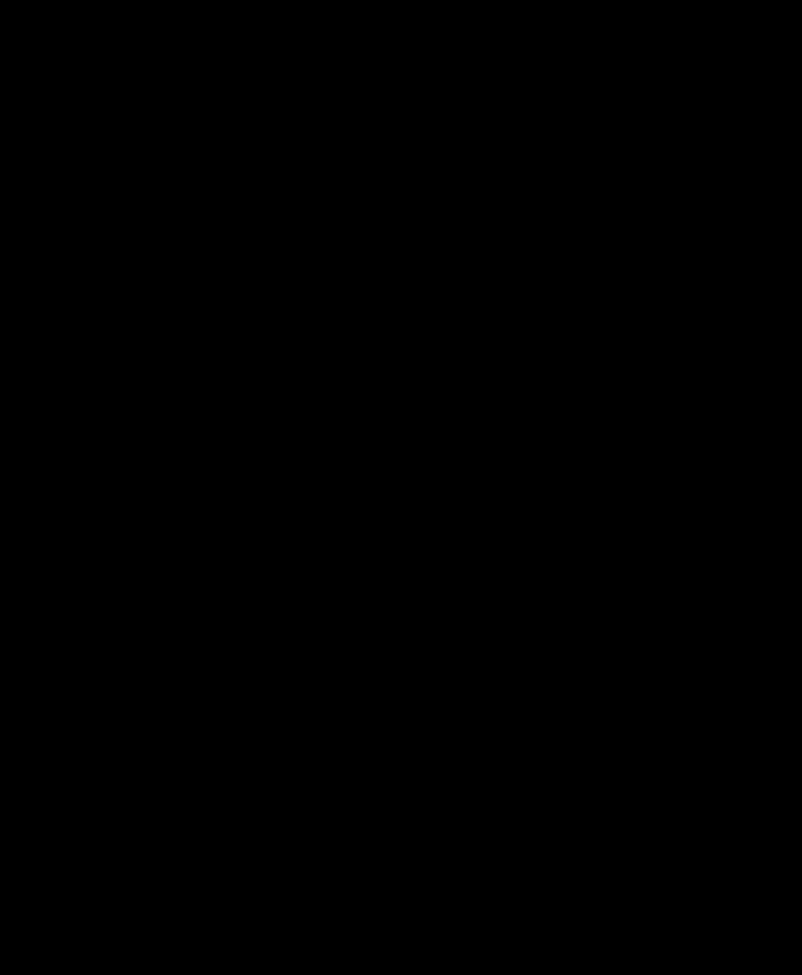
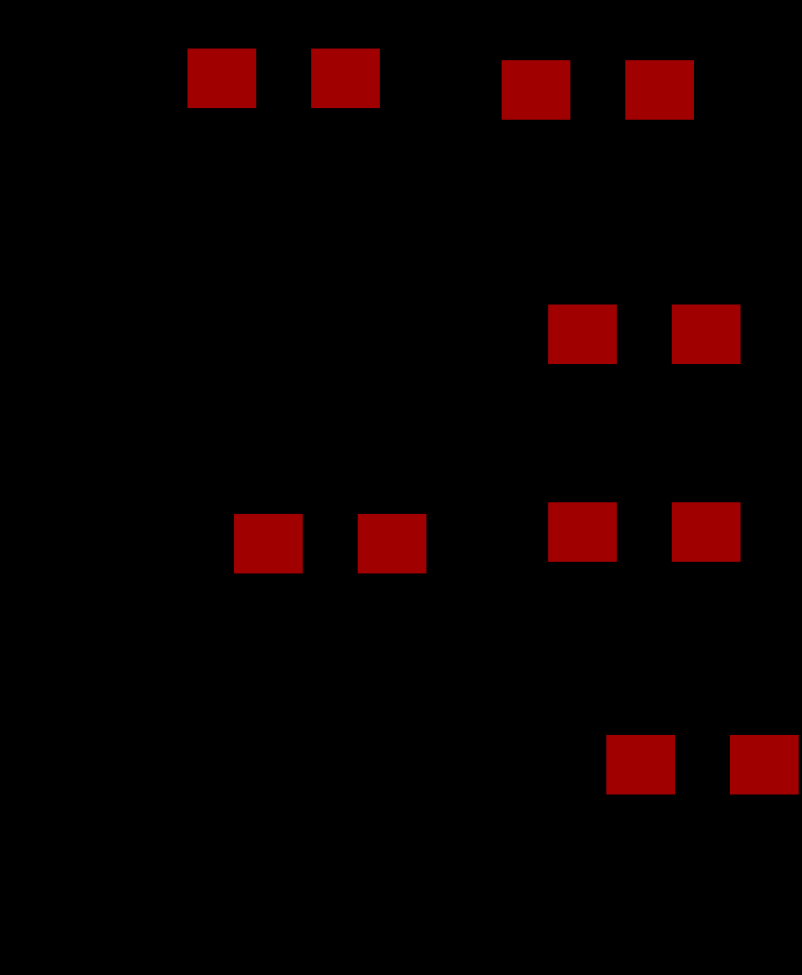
part: none -> (283, 78)
part: none -> (597, 89)
part: none -> (644, 334)
part: none -> (644, 532)
part: none -> (330, 543)
part: none -> (702, 764)

